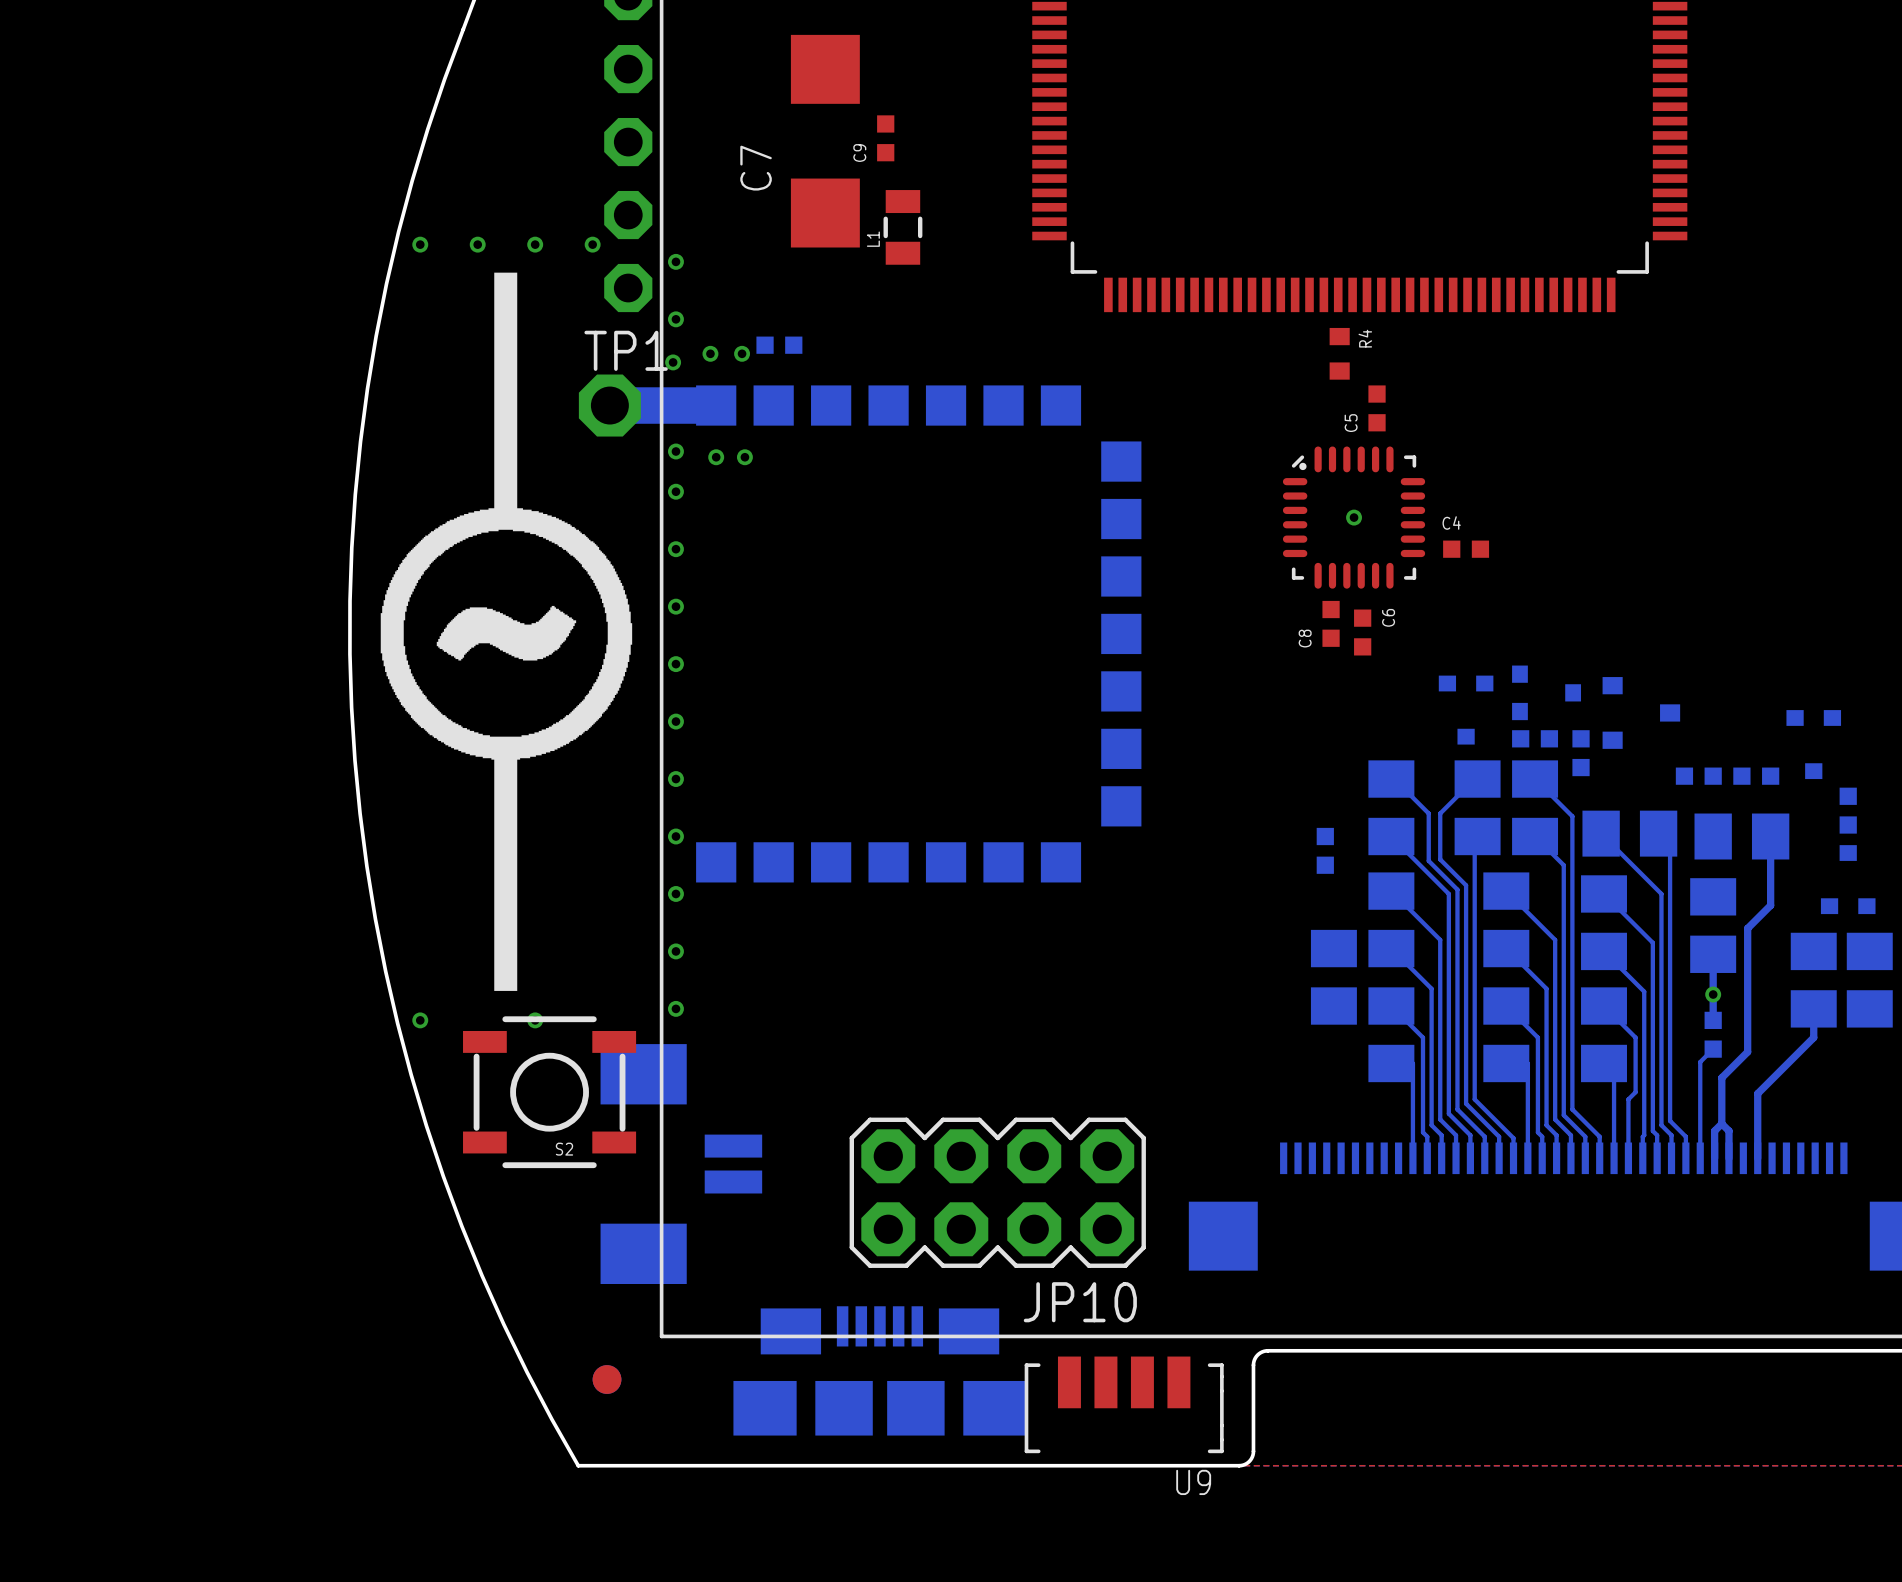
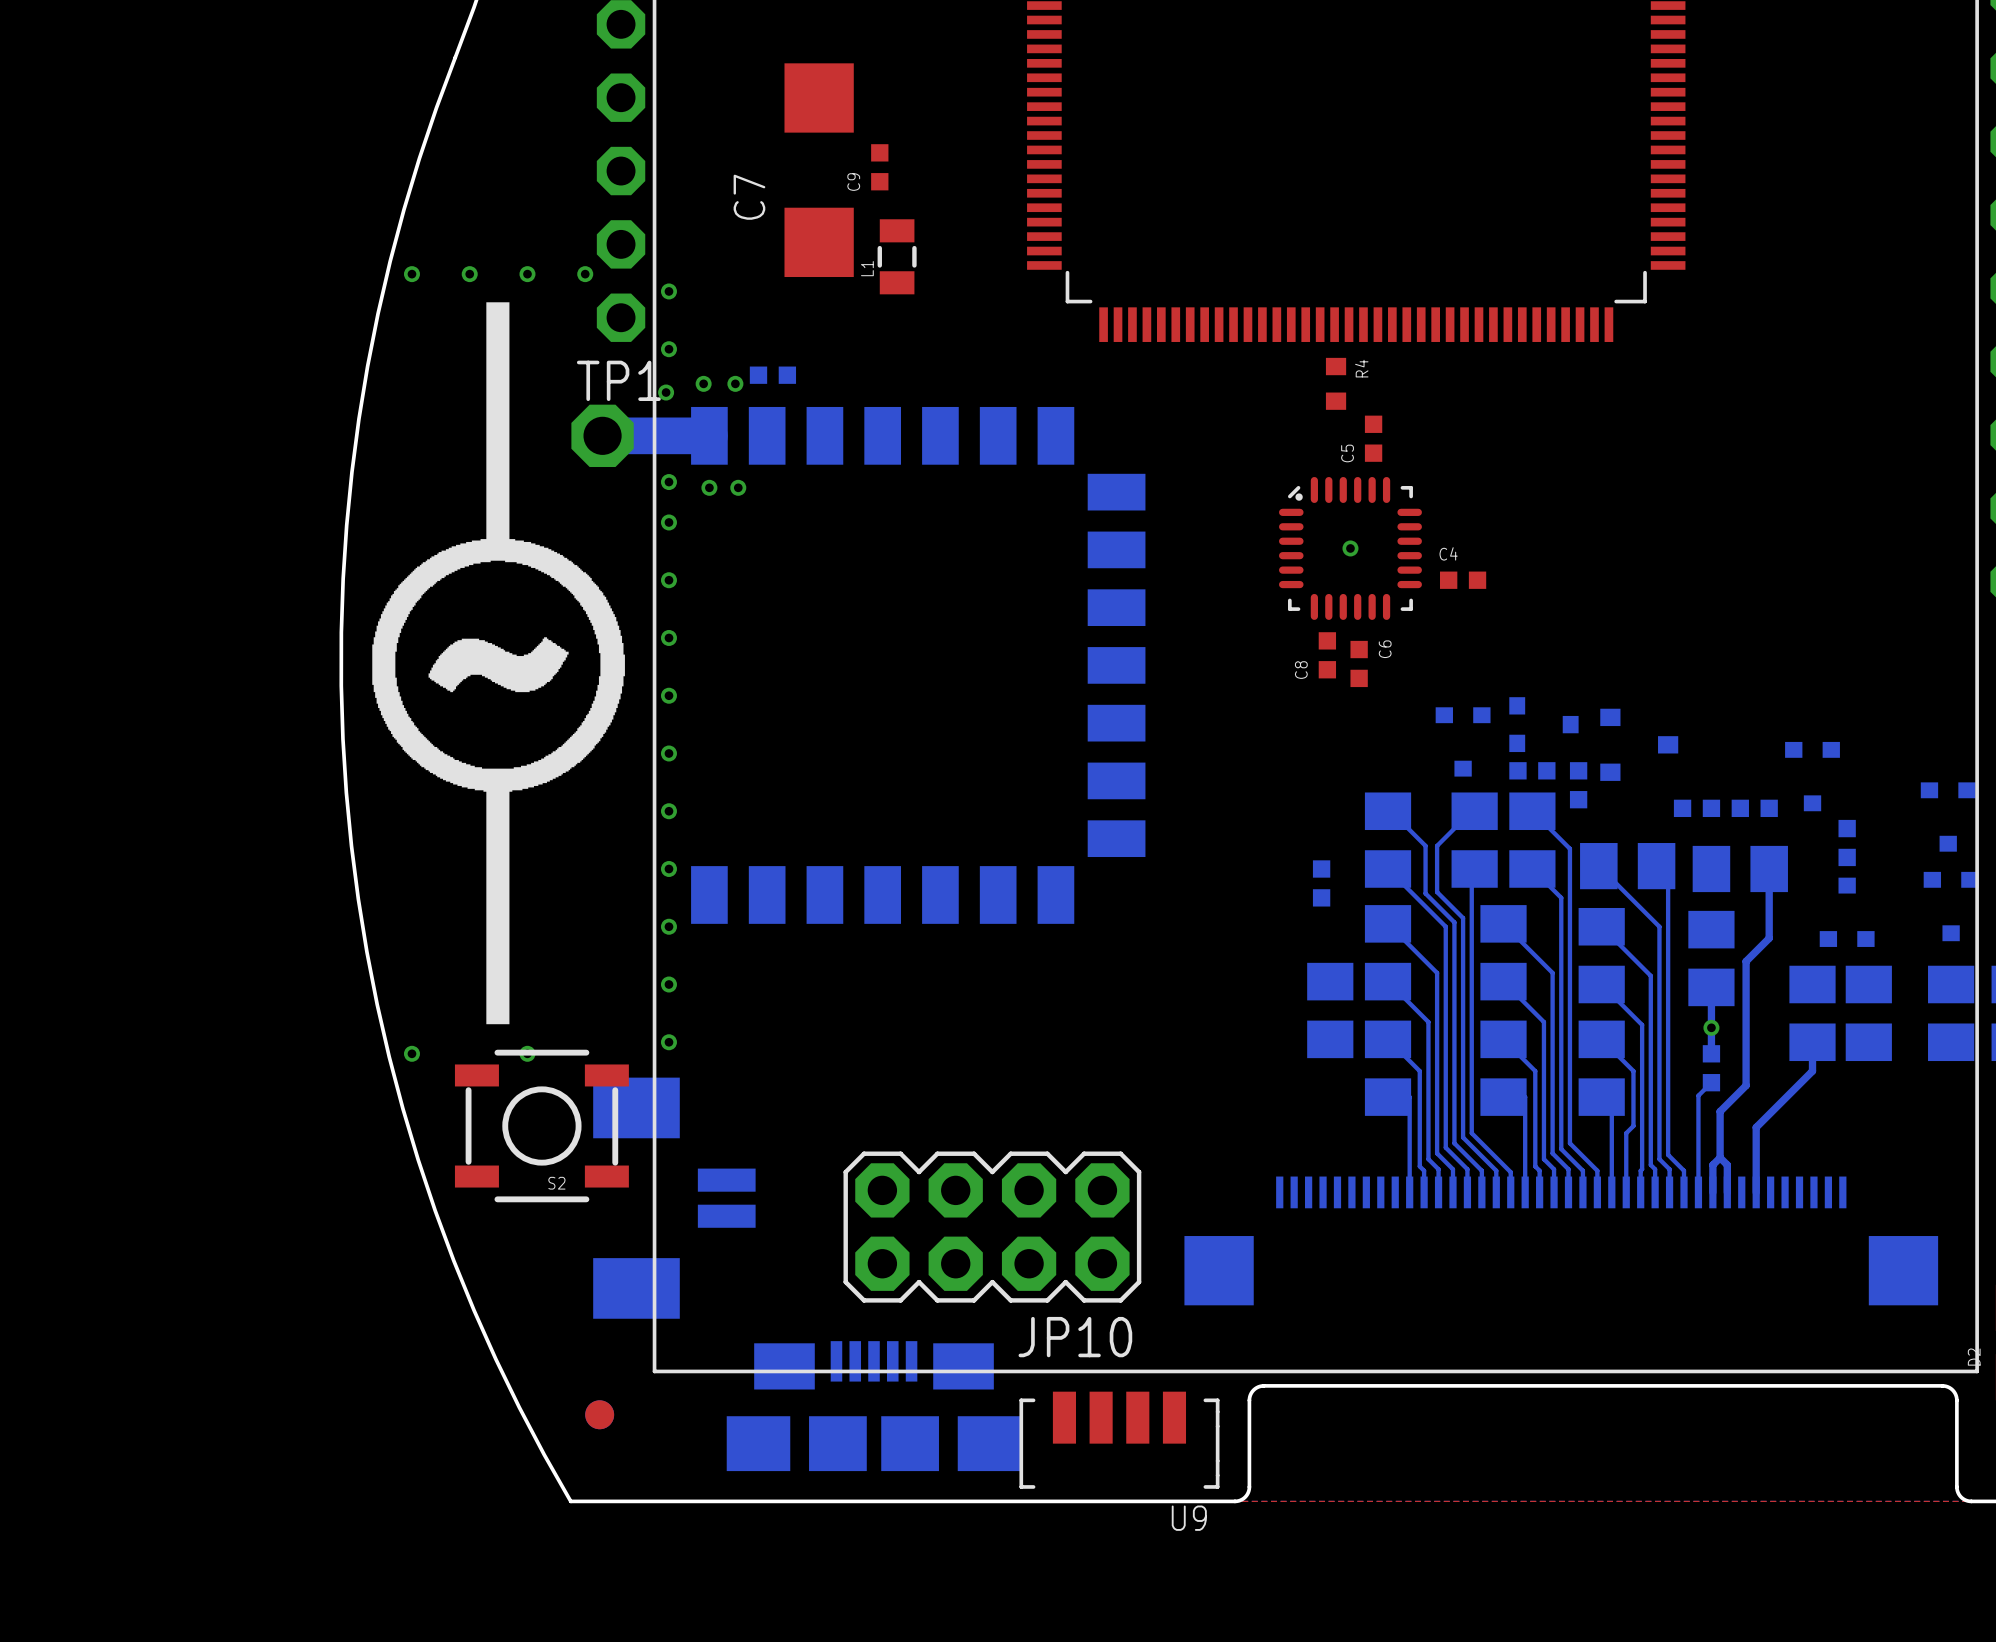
part footprint: [696, 385, 1142, 883] -> [691, 406, 1146, 924]

